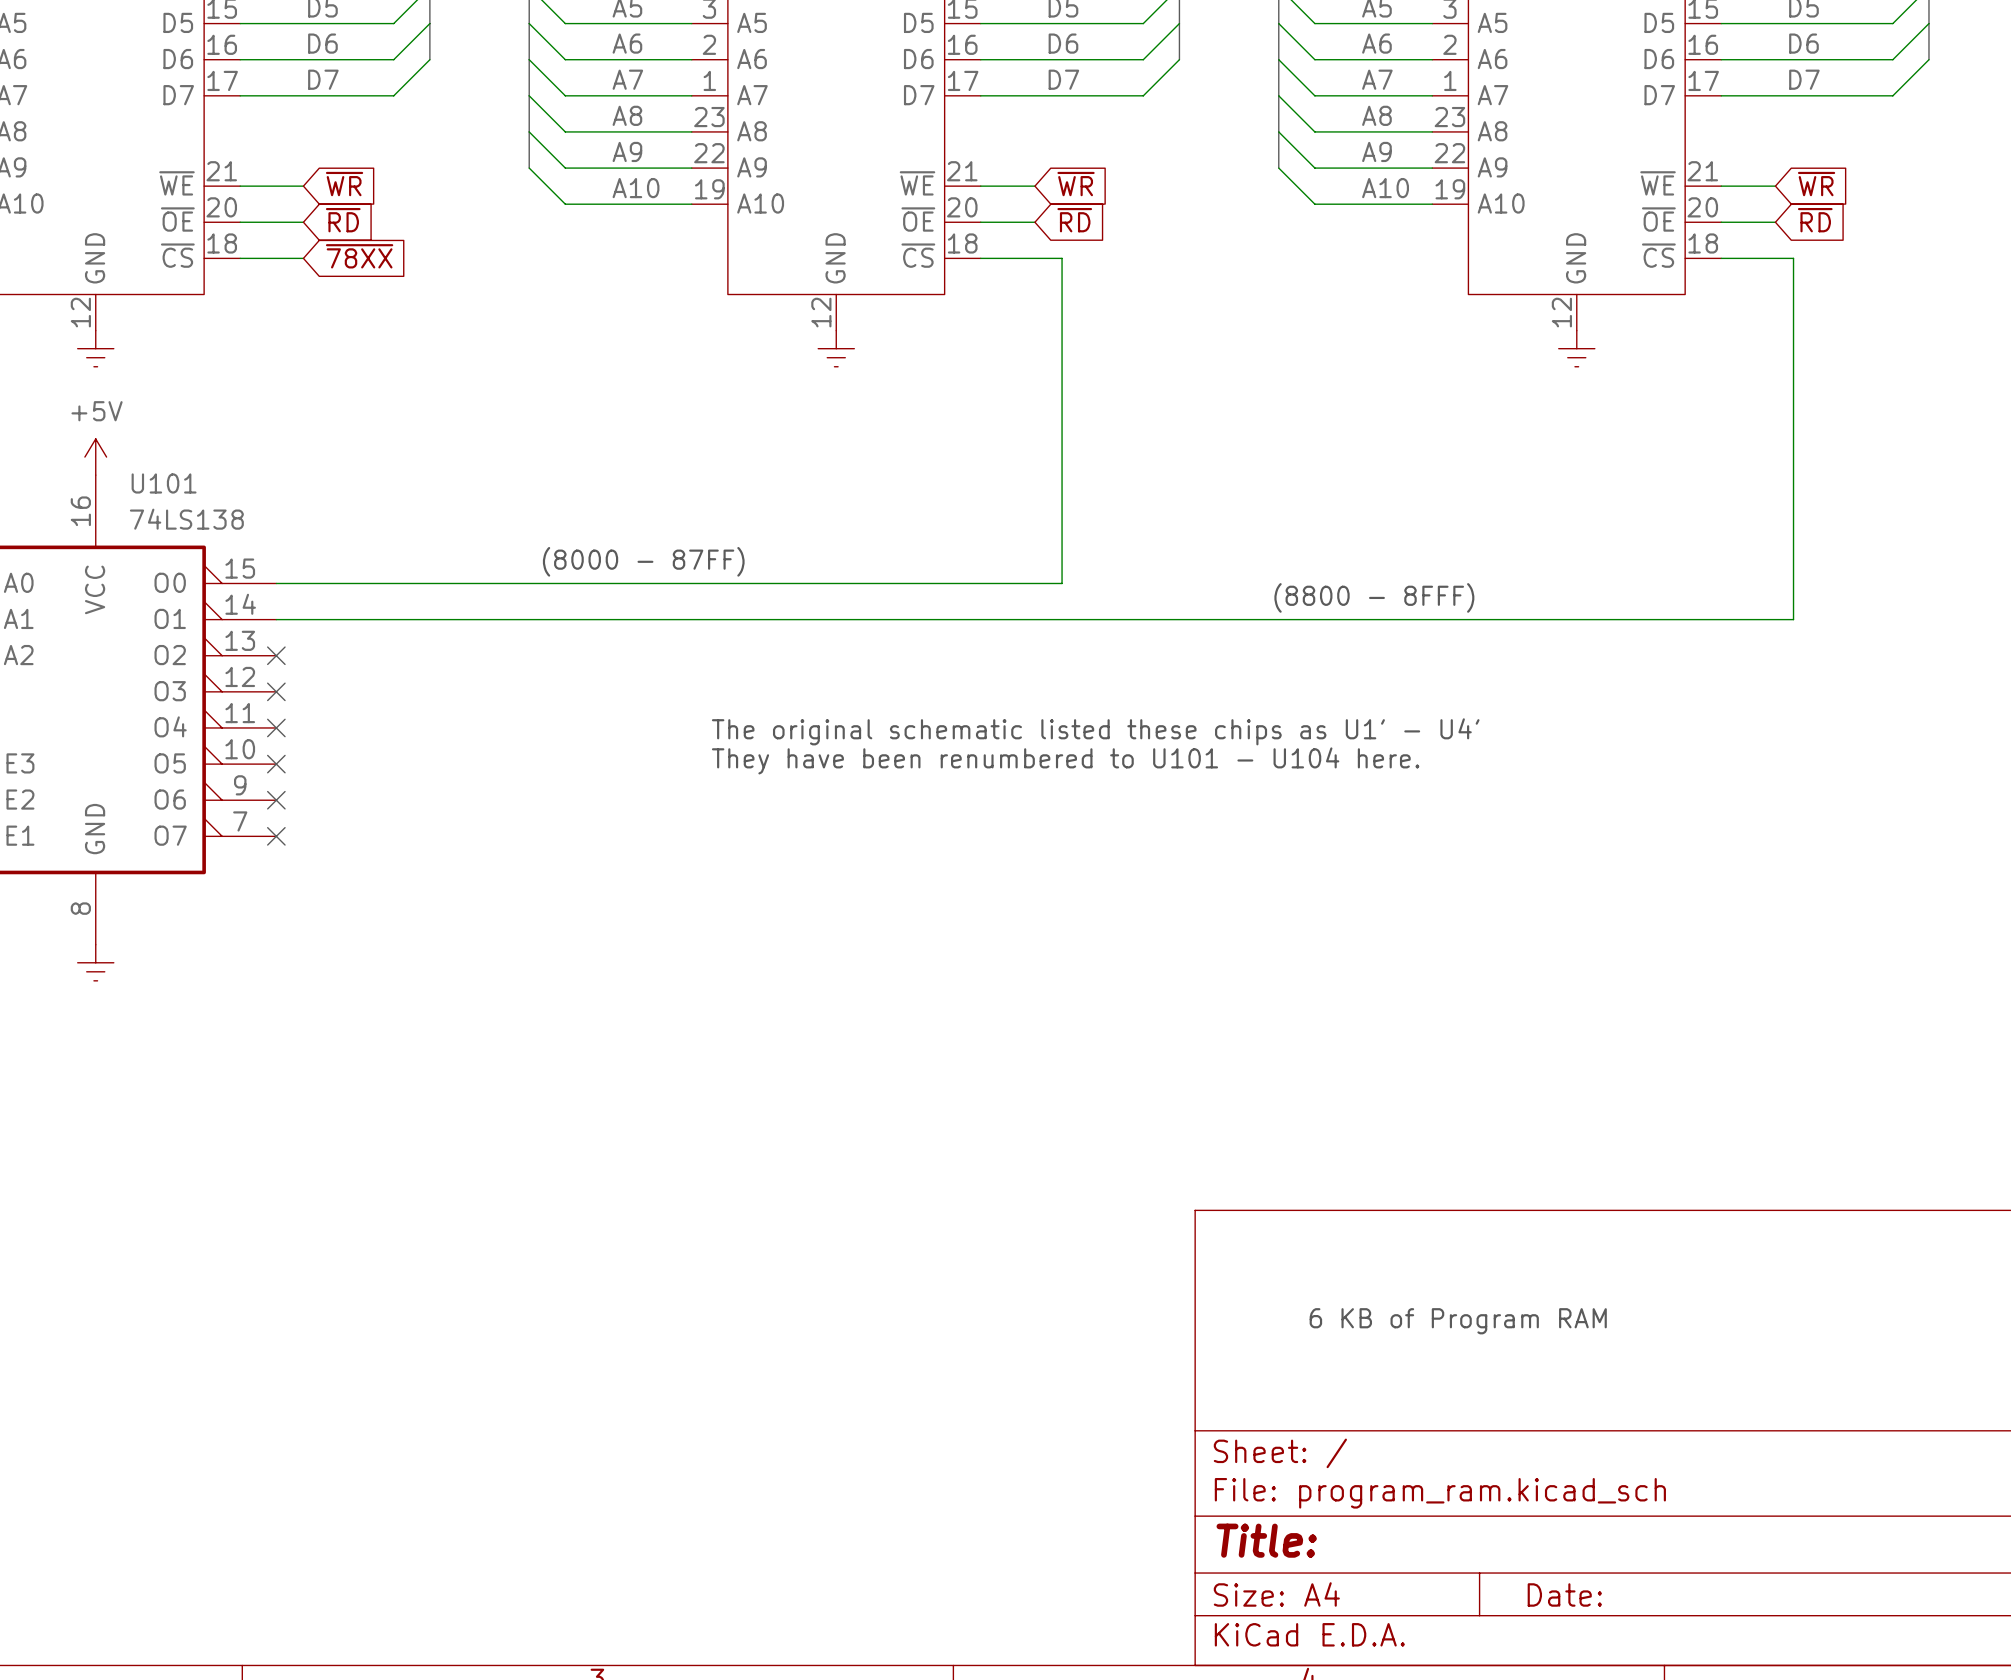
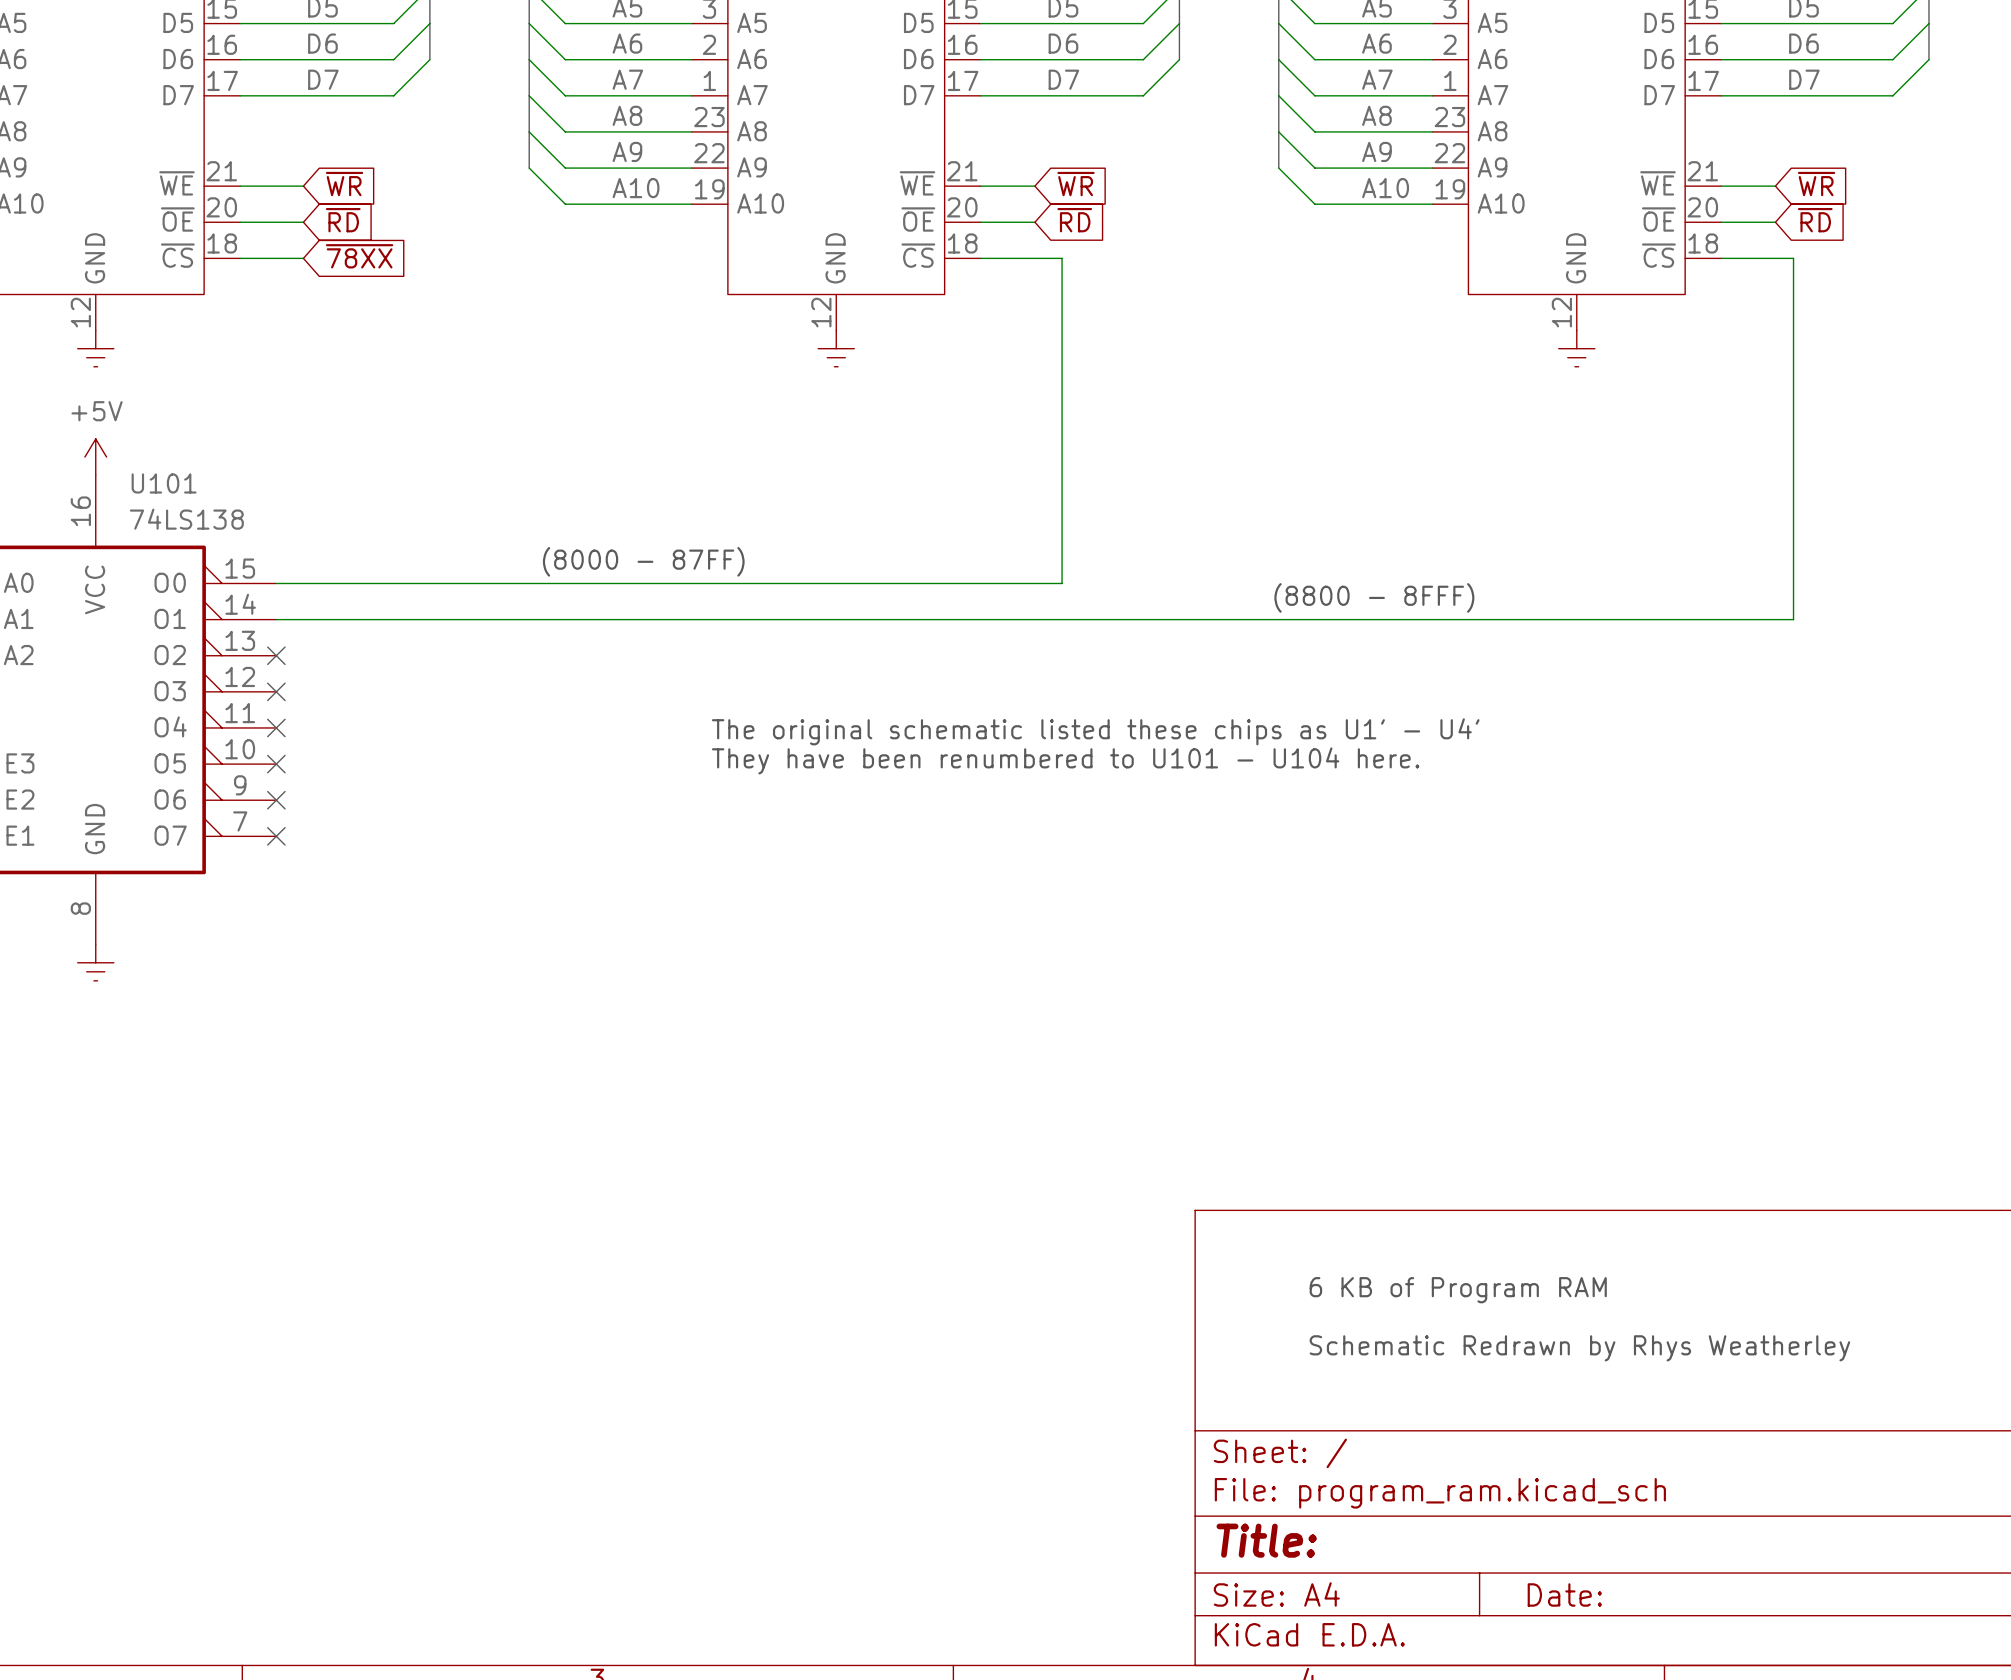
text position: 6 KB of Program RAM (1458, 1321) -> 6 KB of Program RAM (1458, 1290)
text: none -> Schematic Redrawn by Rhys Weatherley (1579, 1348)

